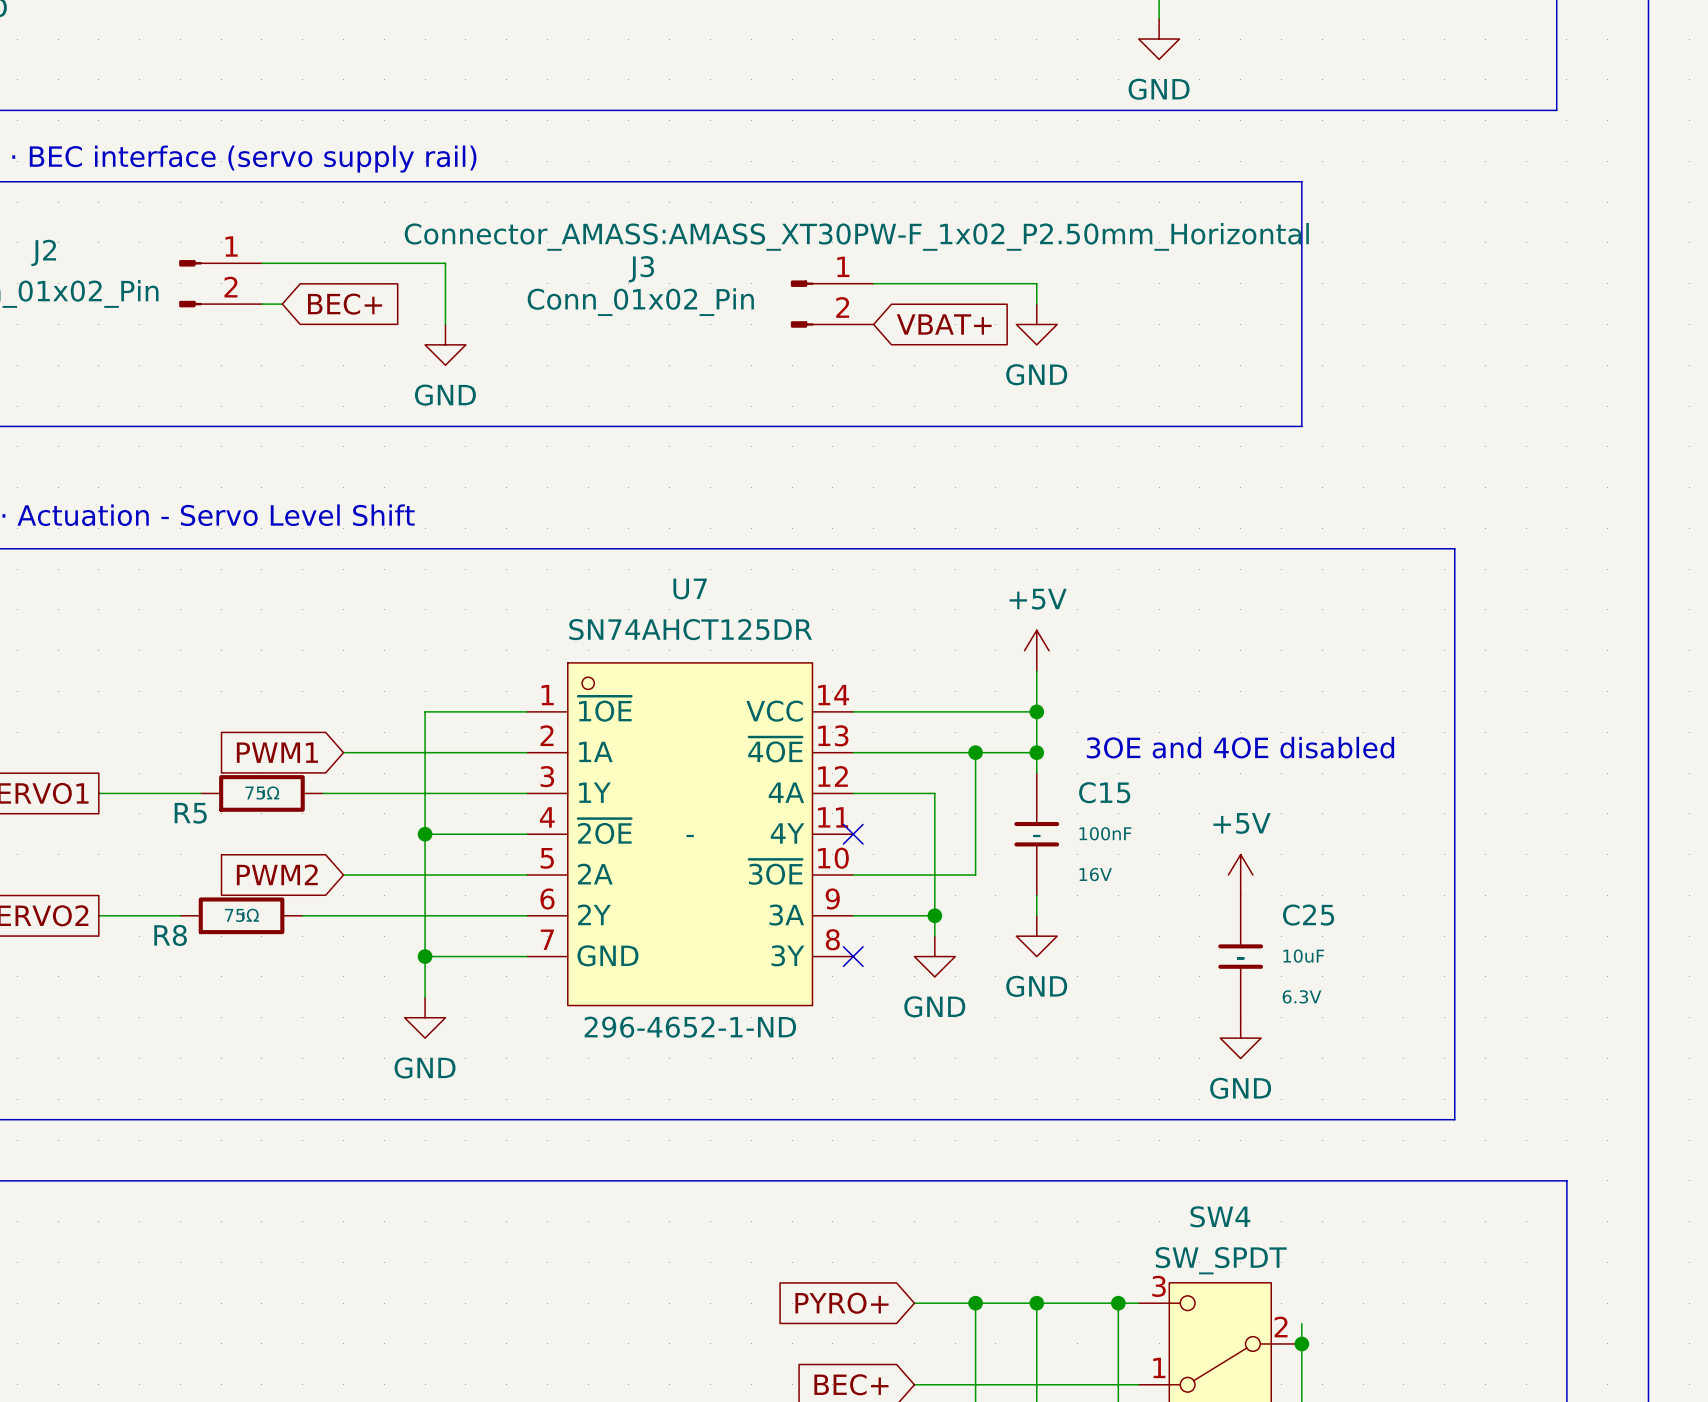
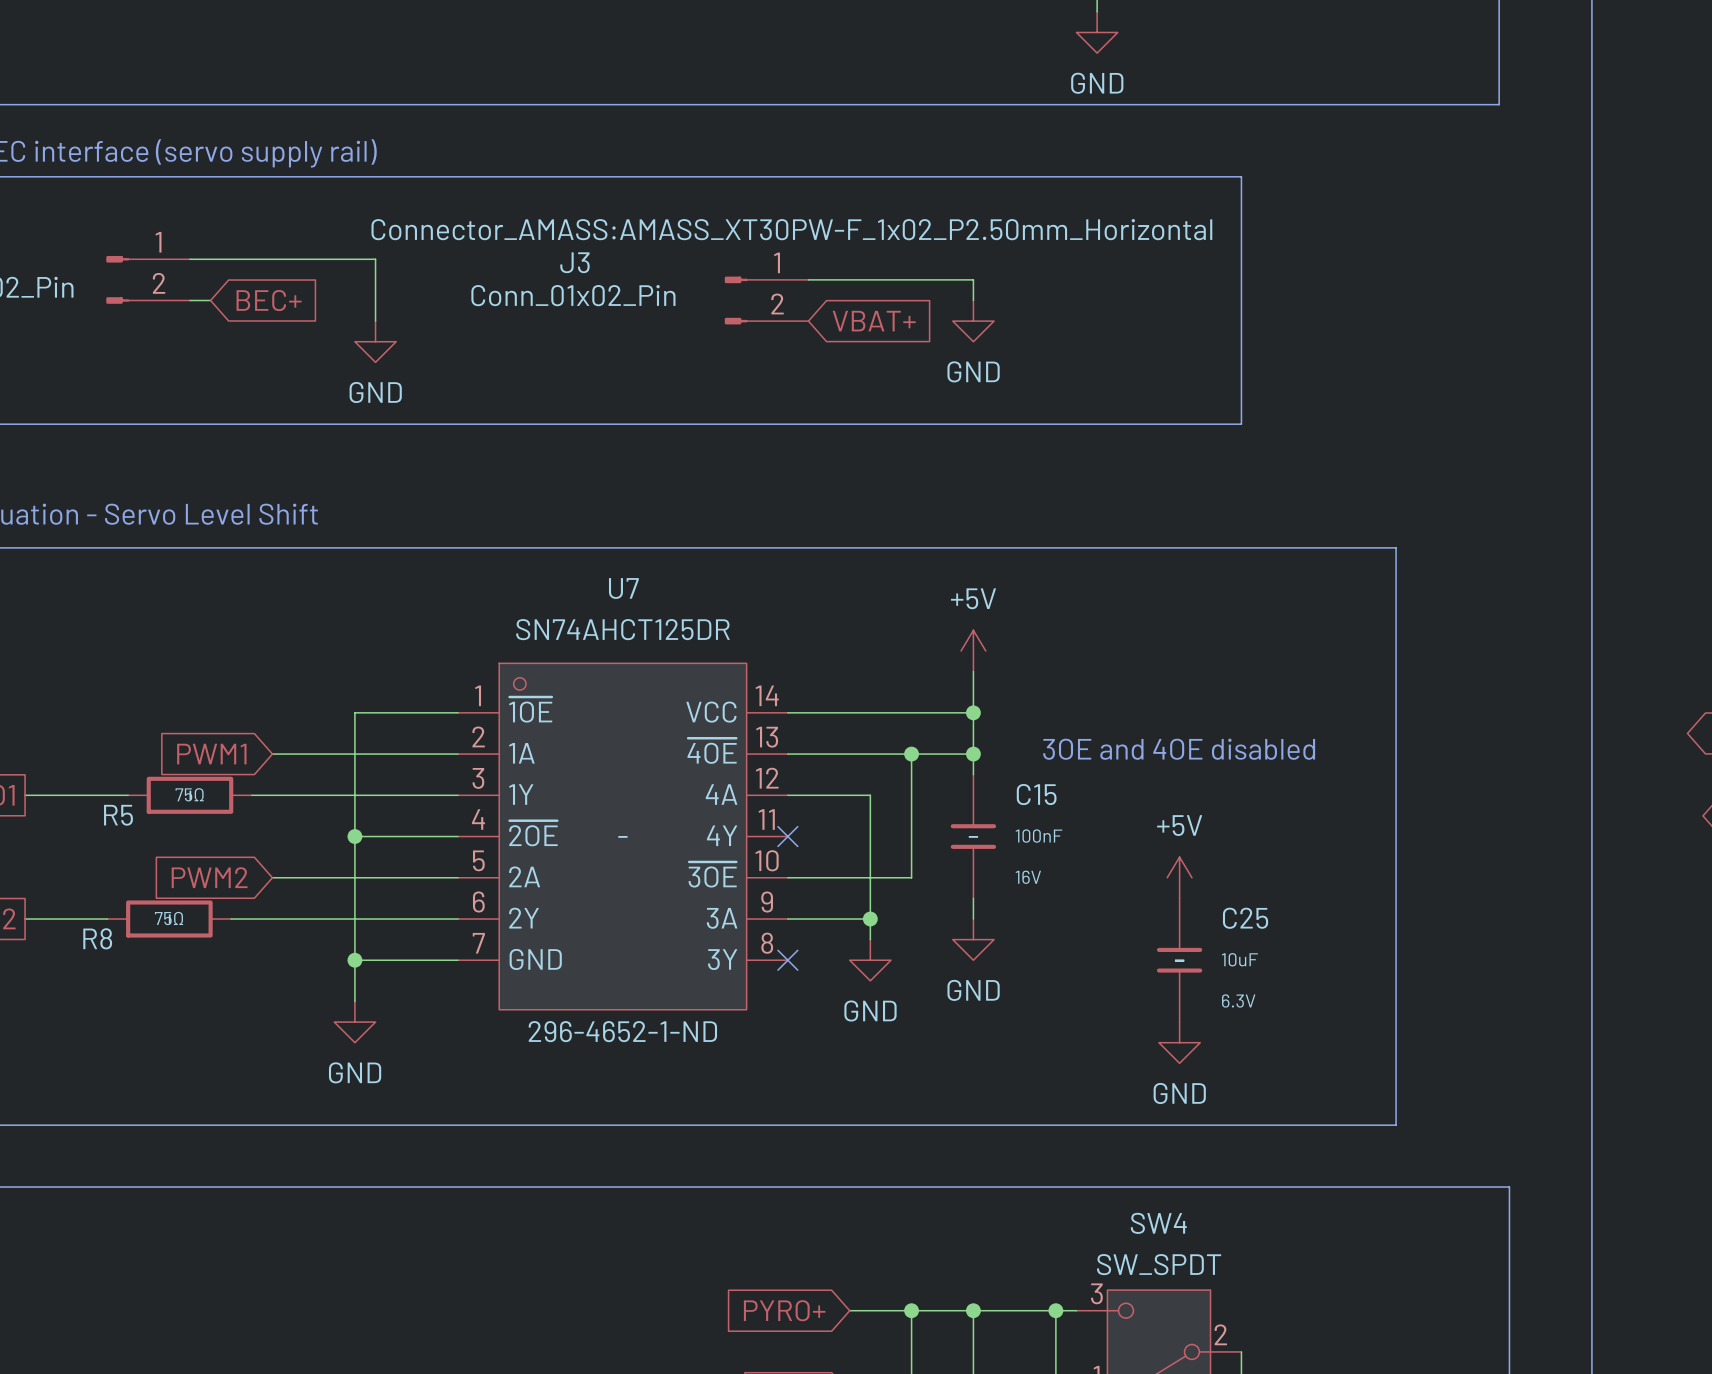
wire: (1301, 1323) (1301, 1343) -> none
junction: (1301, 1343) -> none

